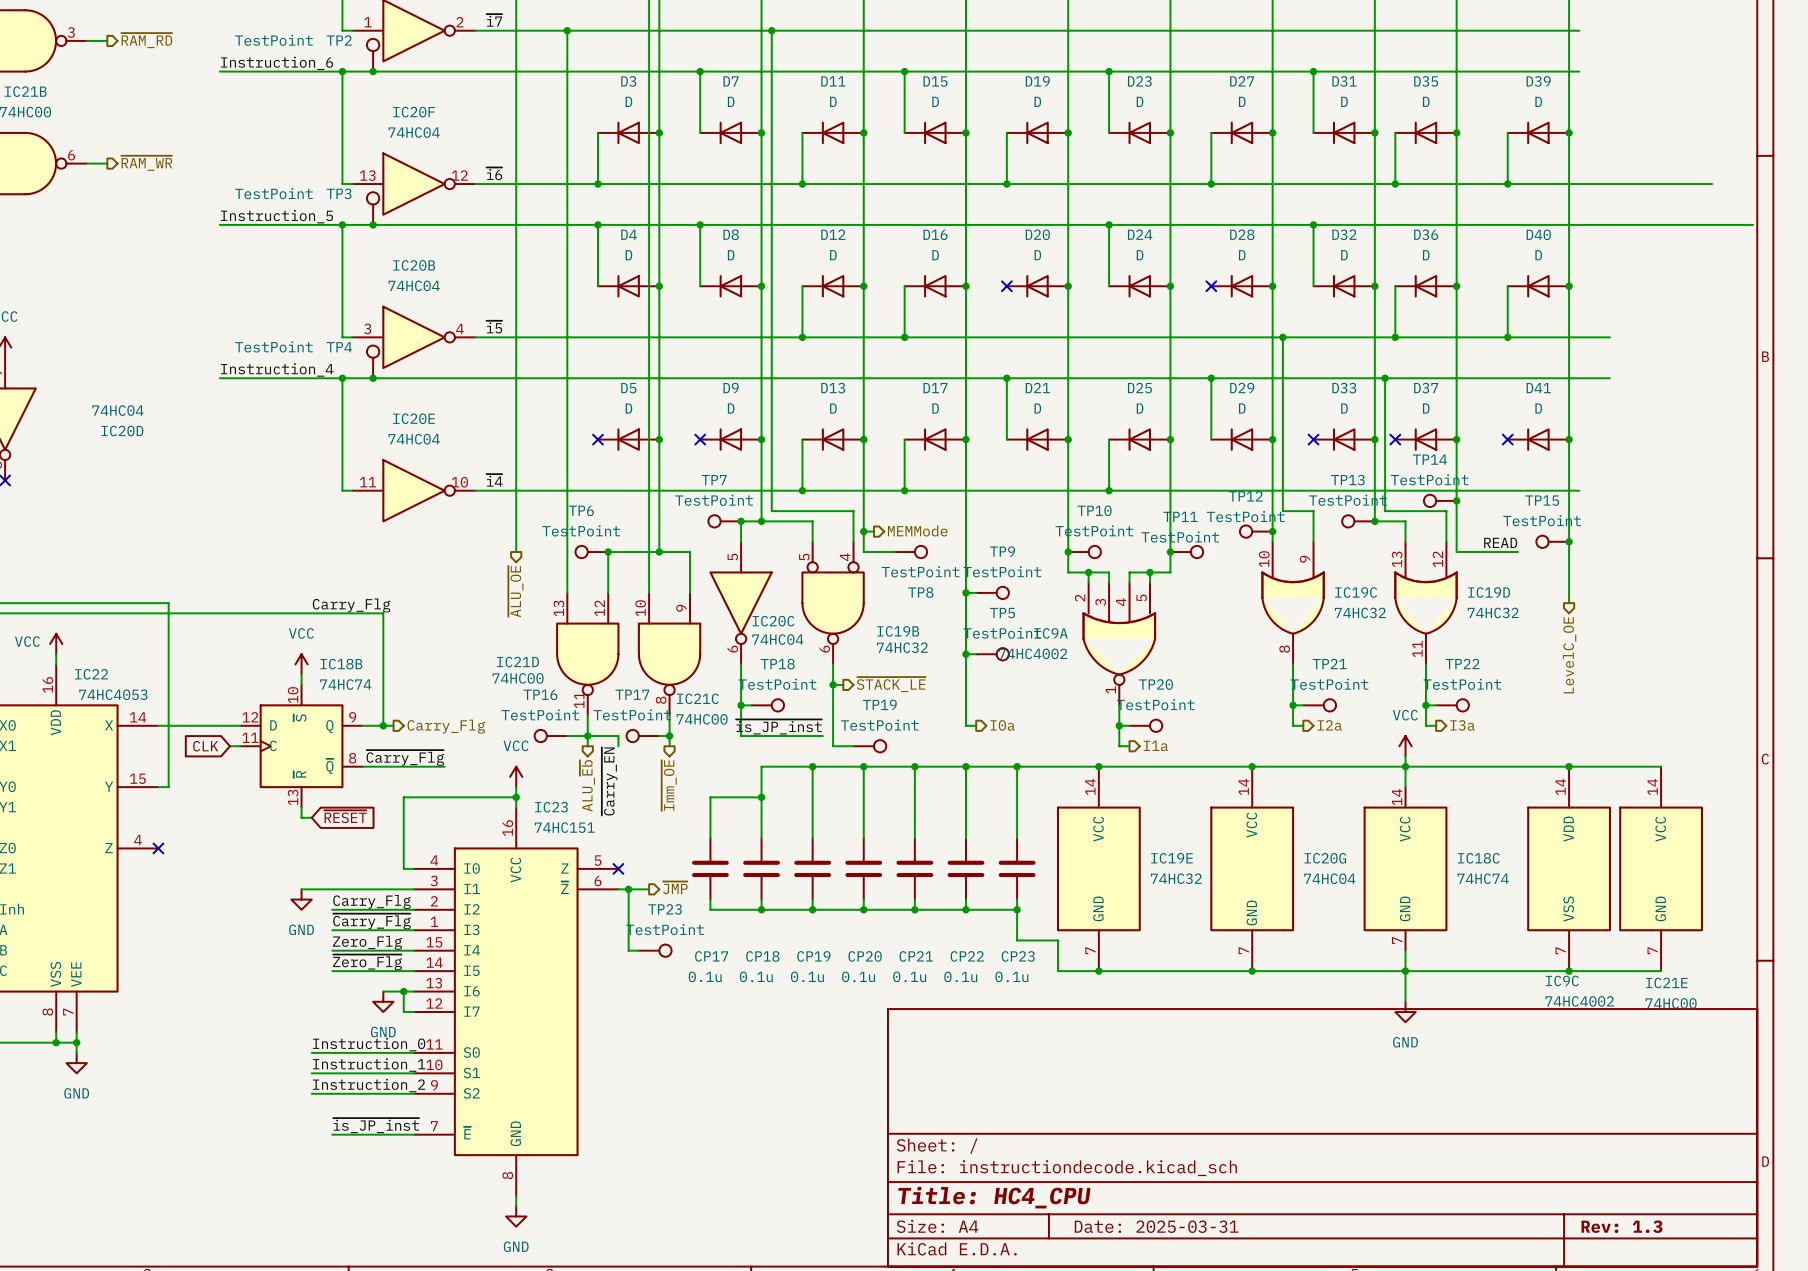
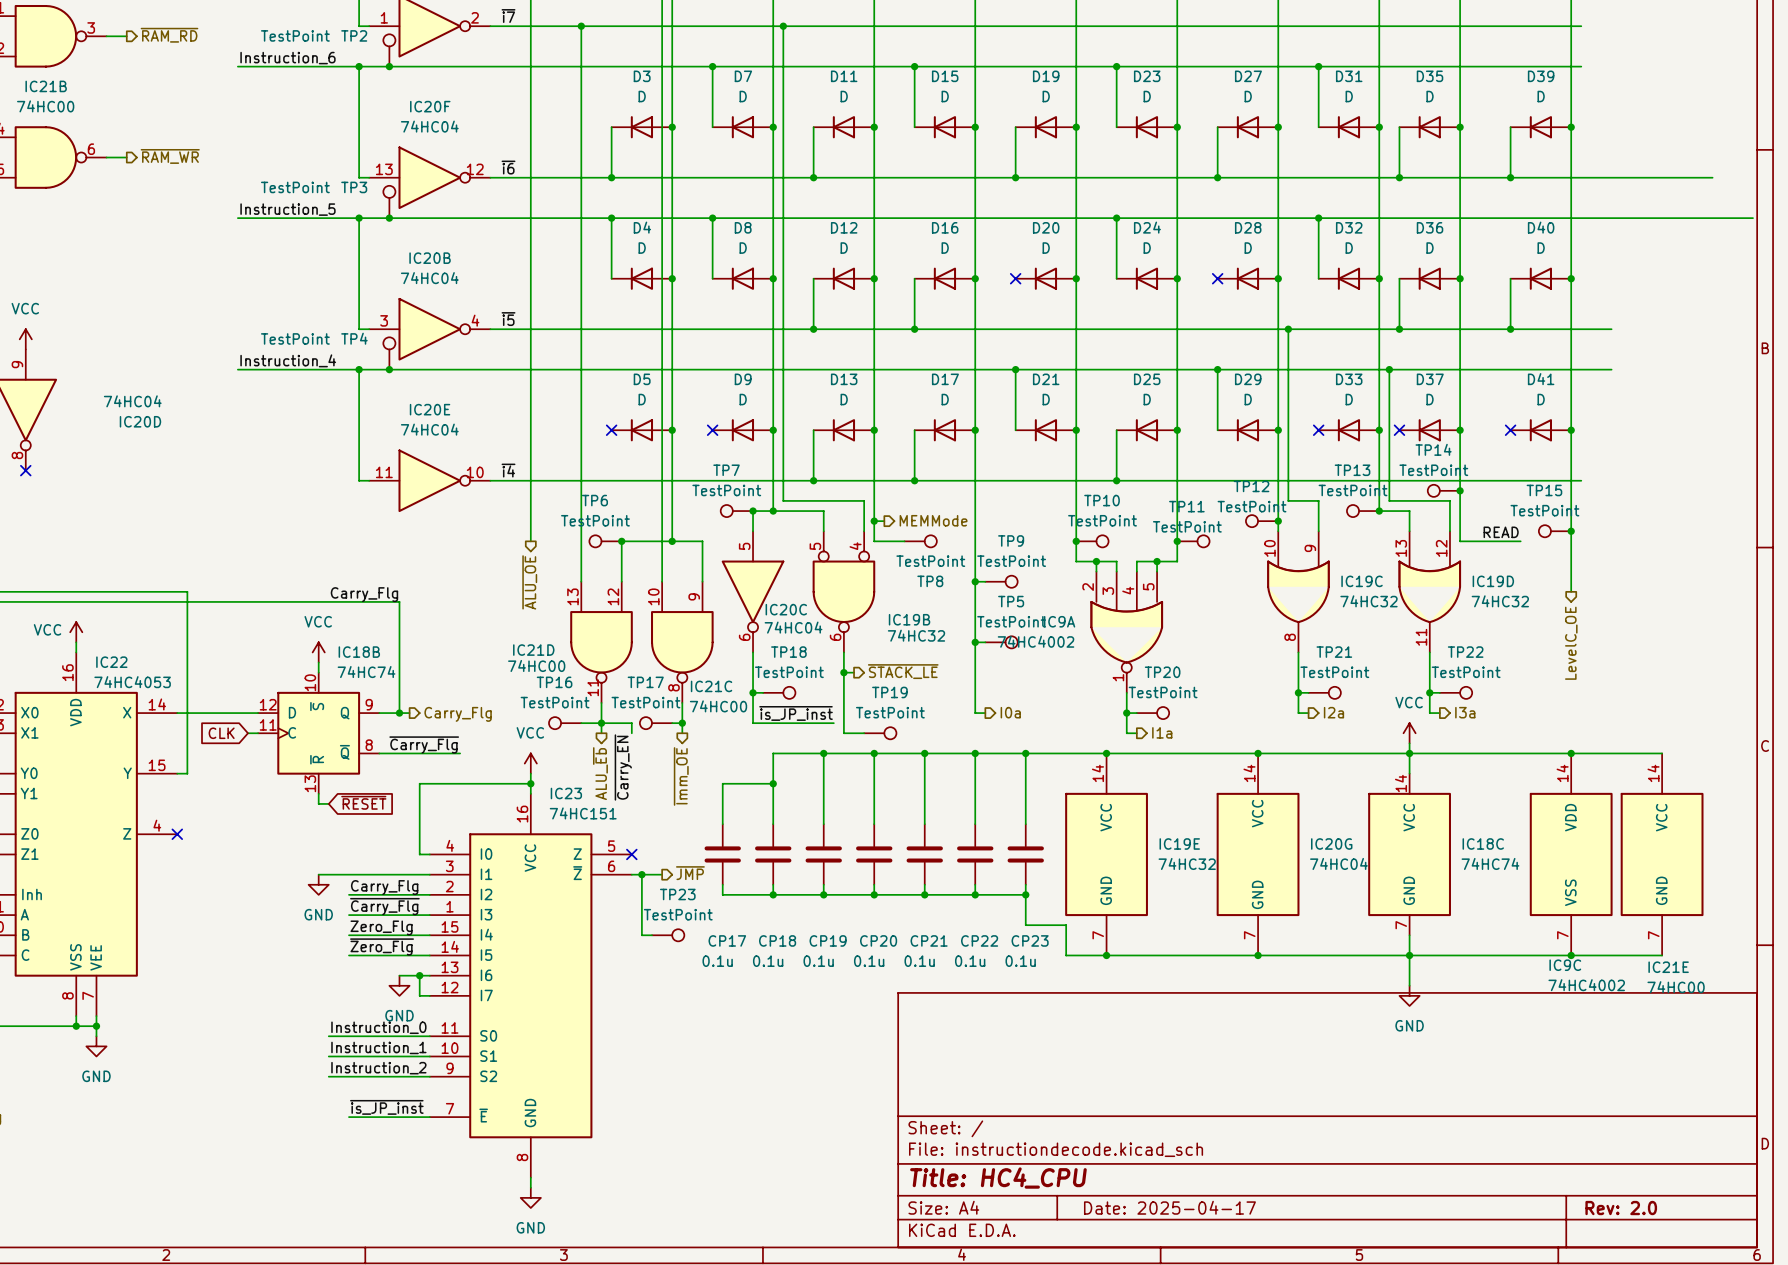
title block: Date: 2025-03-31 (1156, 1226) -> Date: 2025-04-17 (1169, 1207)
title block: Rev: 1.3 (1621, 1226) -> Rev: 2.0 (1621, 1208)

